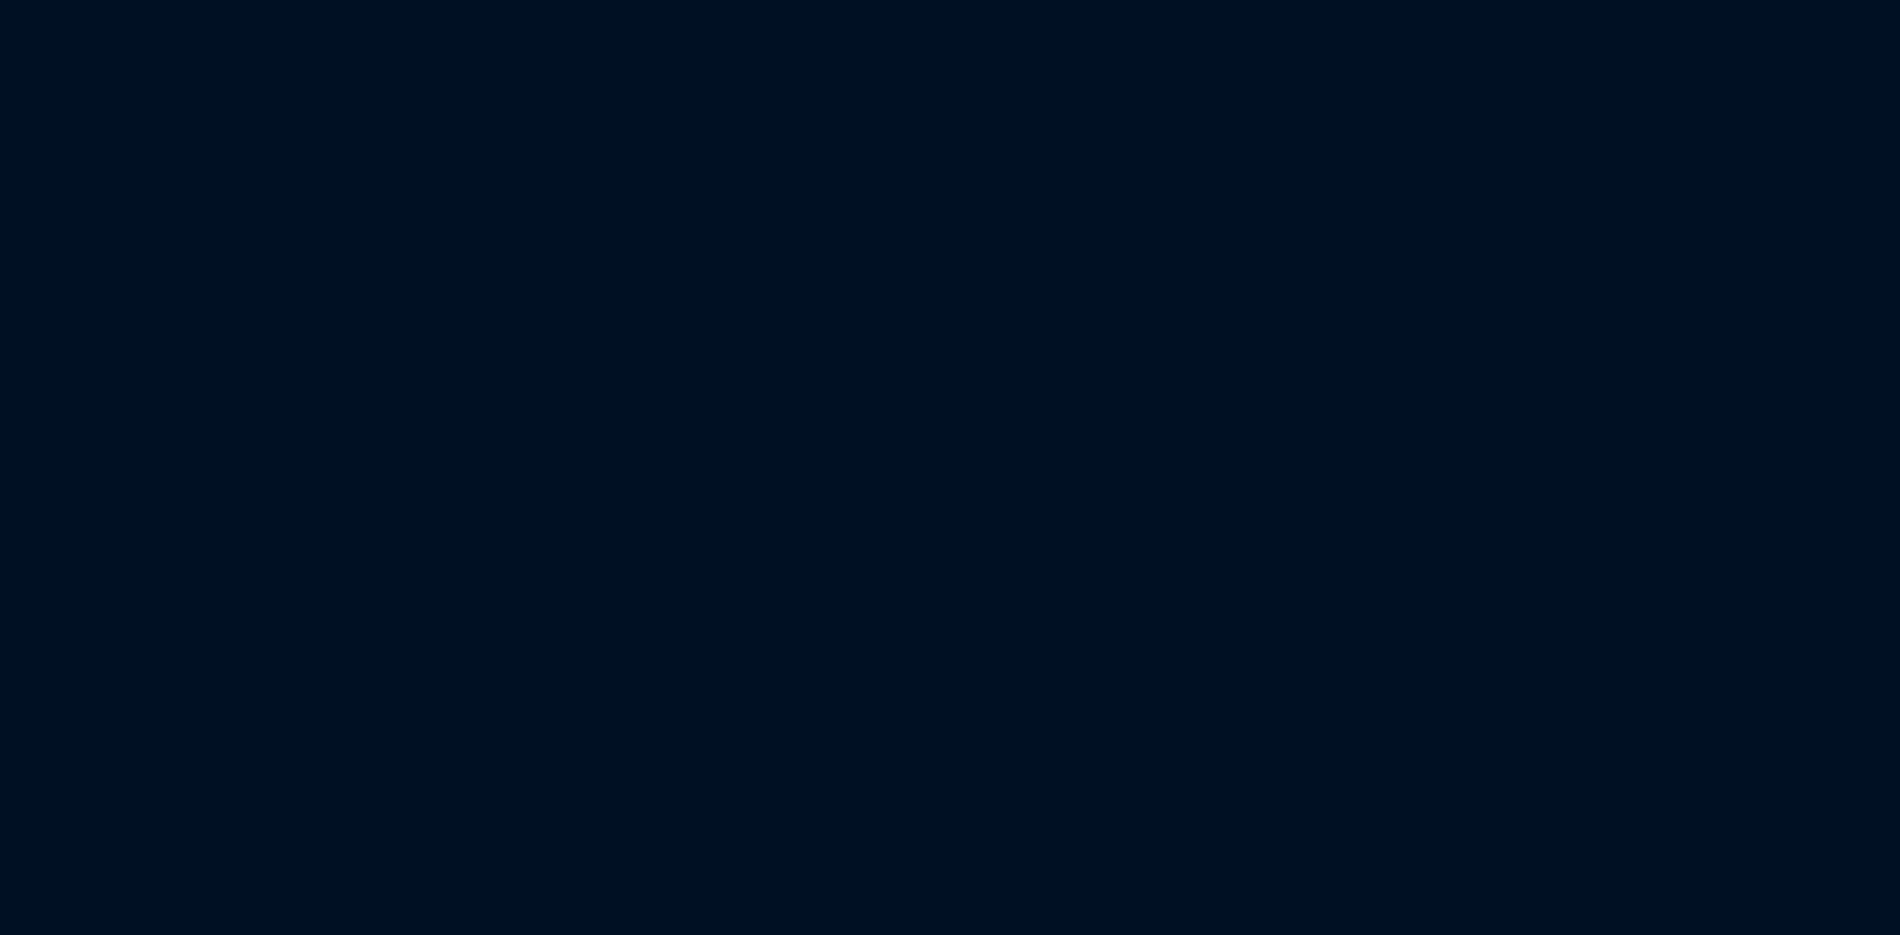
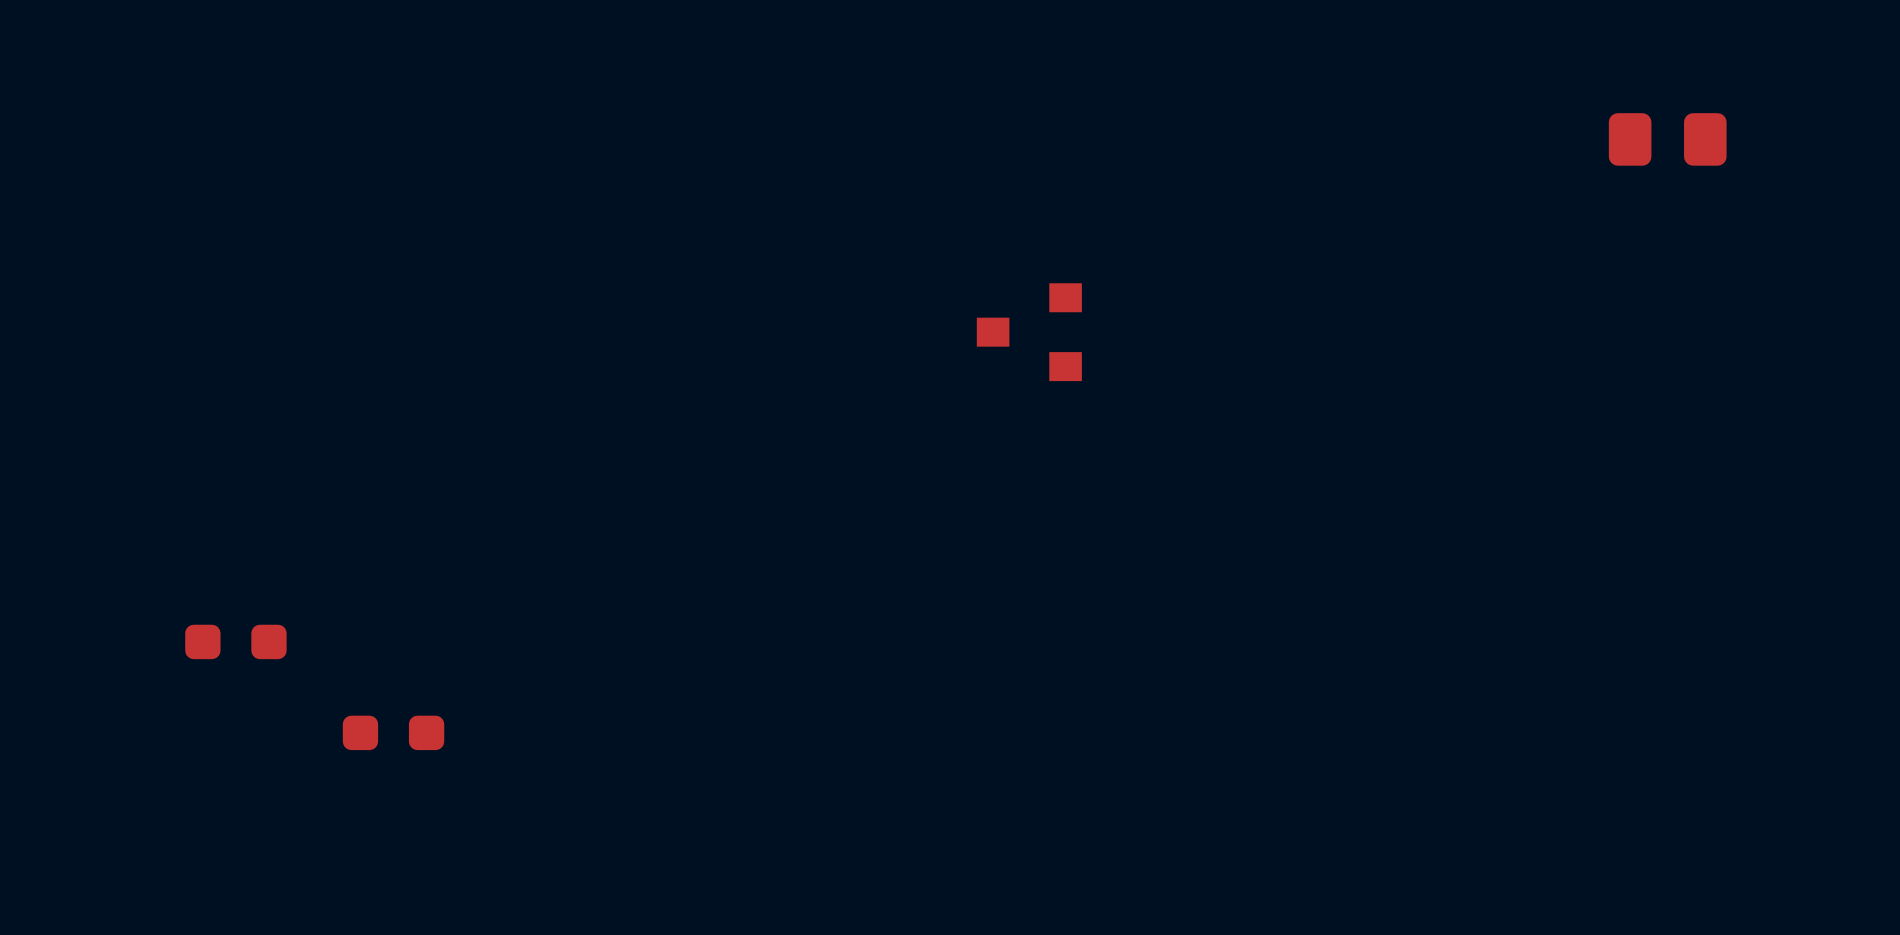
part: none -> (1667, 139)
part: none -> (1029, 332)
part: none -> (235, 641)
part: none -> (393, 732)

